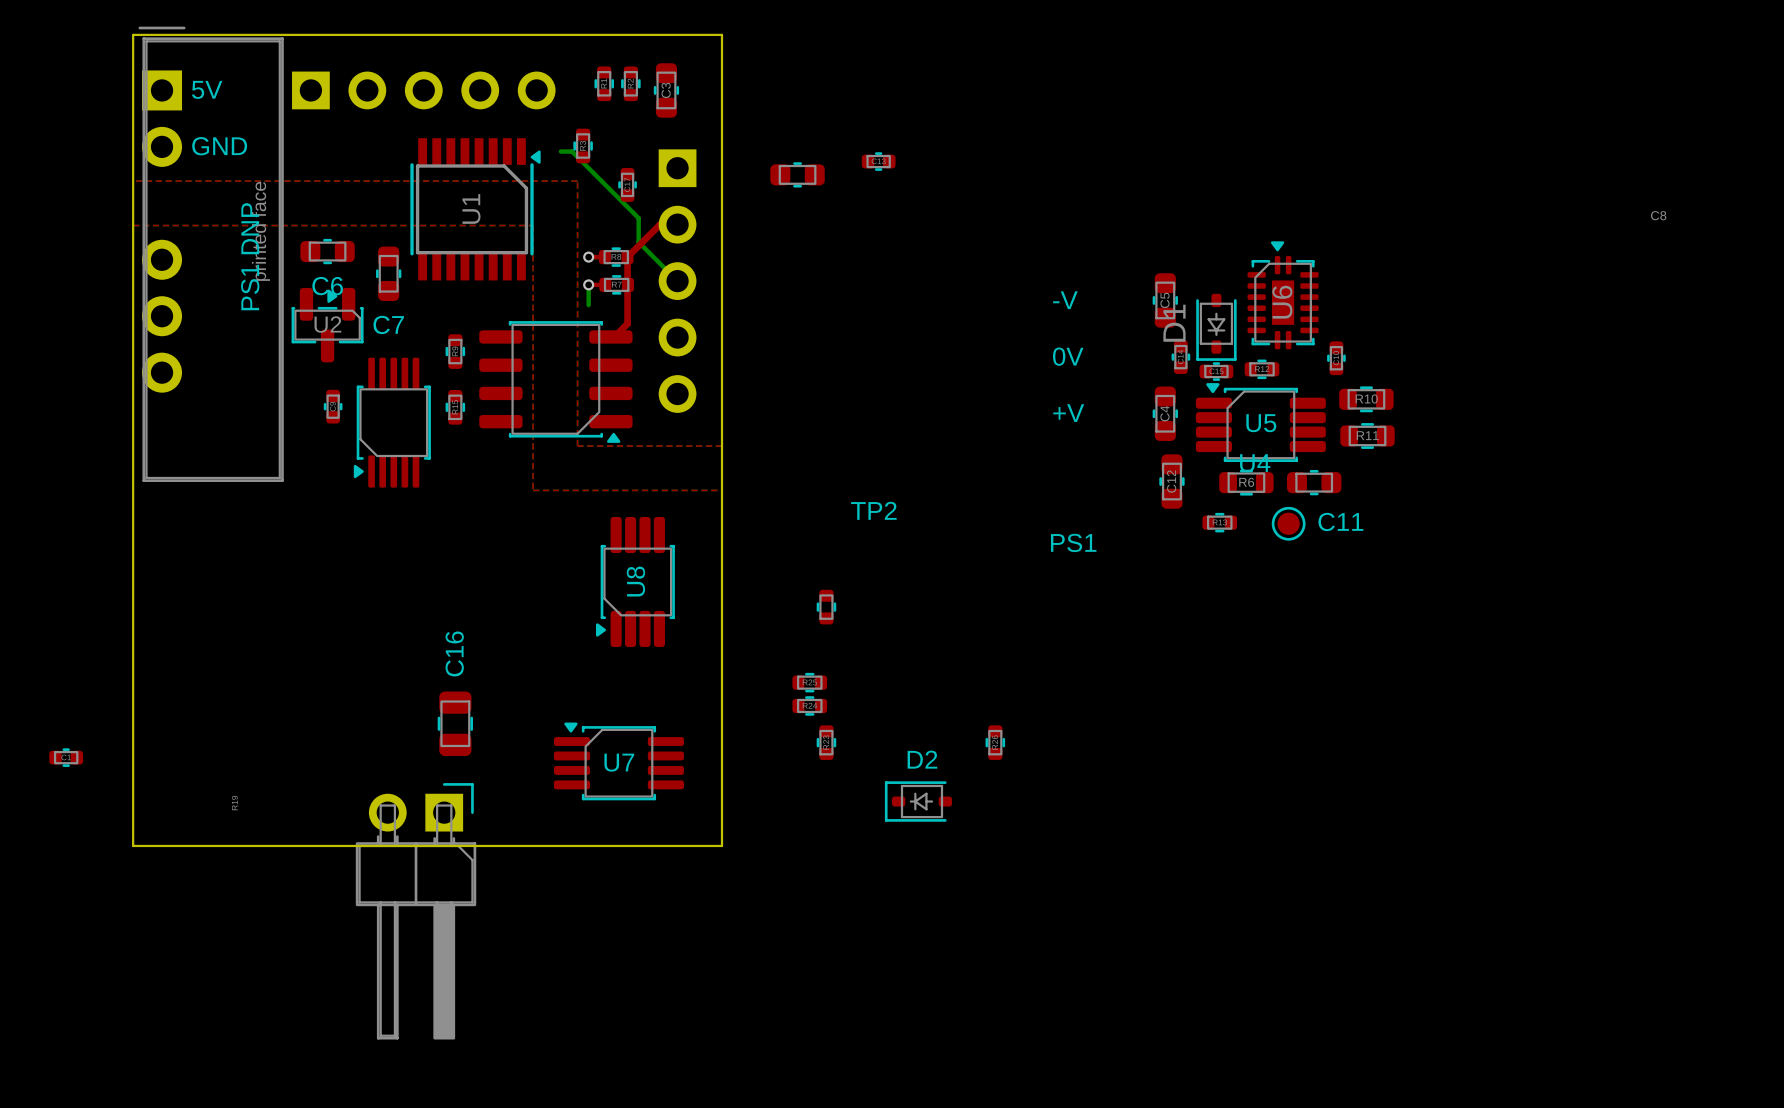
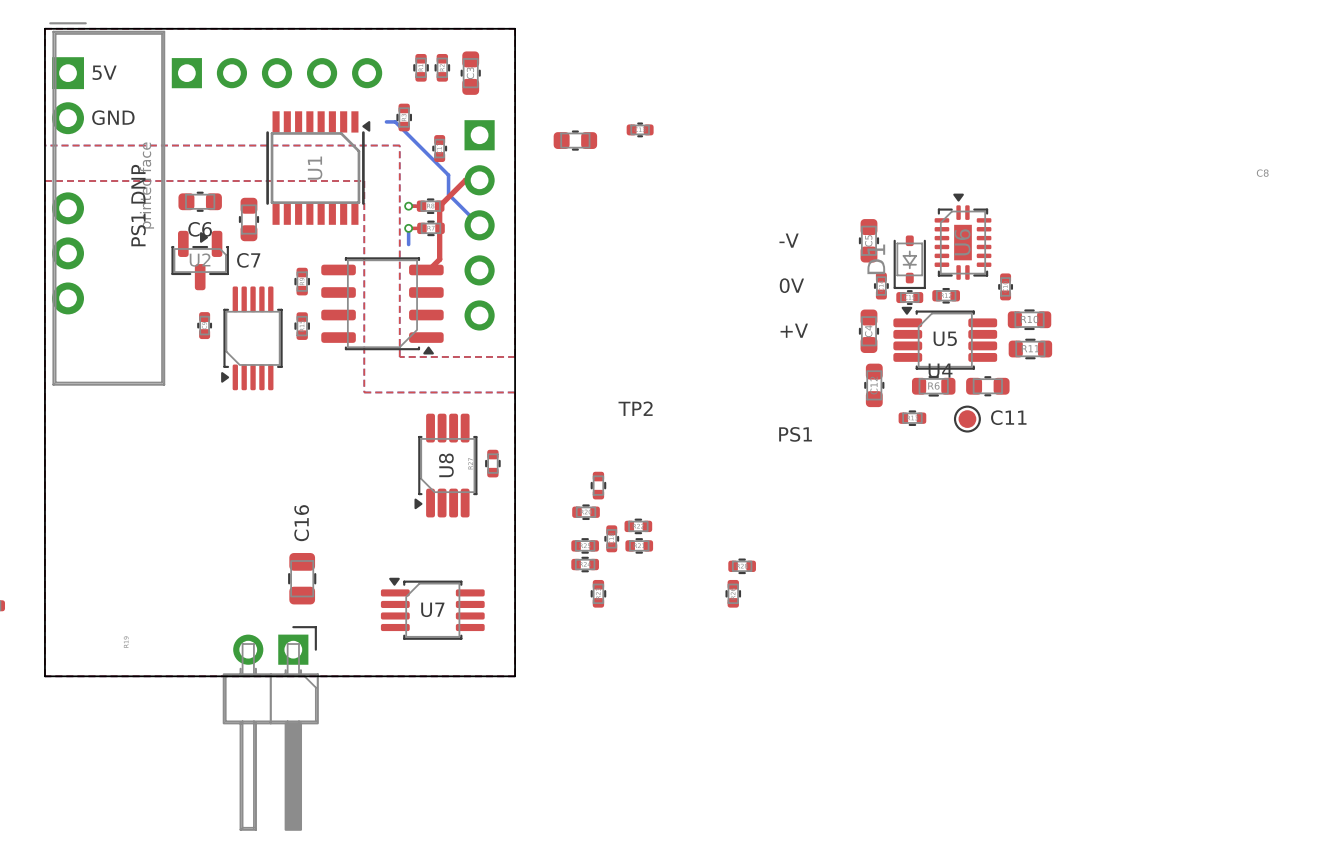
part: none -> (492, 463)
part: none -> (586, 512)
part: none -> (638, 526)
part: none -> (611, 538)
part: none -> (639, 545)
part: none -> (742, 566)
D2: (918, 801) -> none

